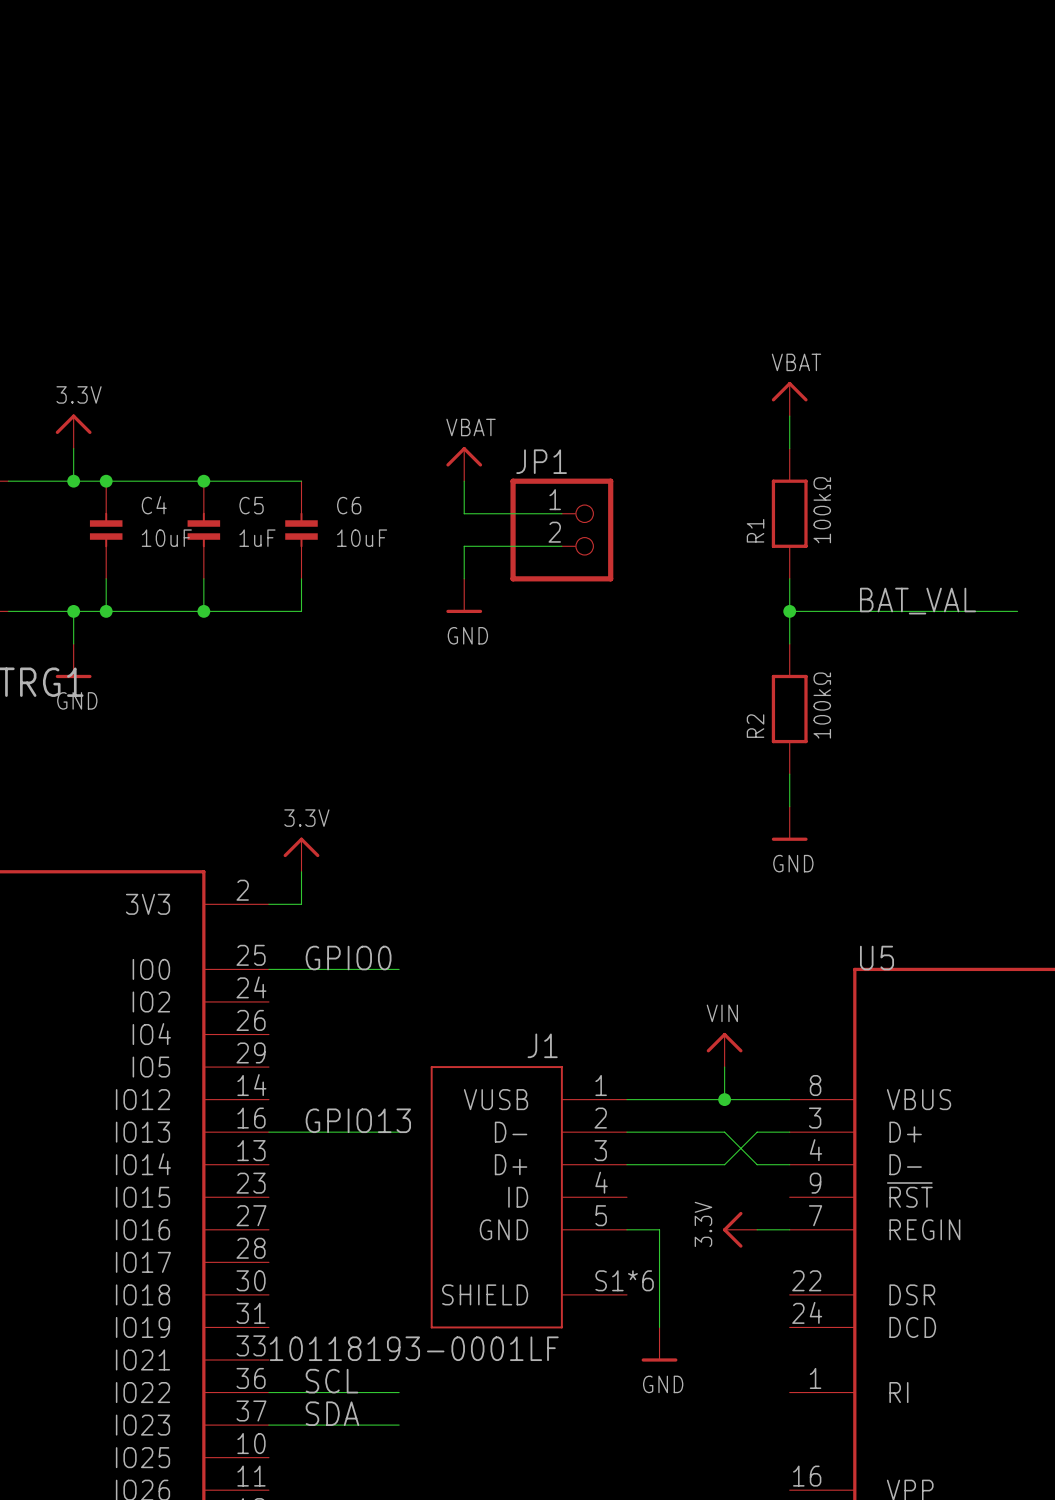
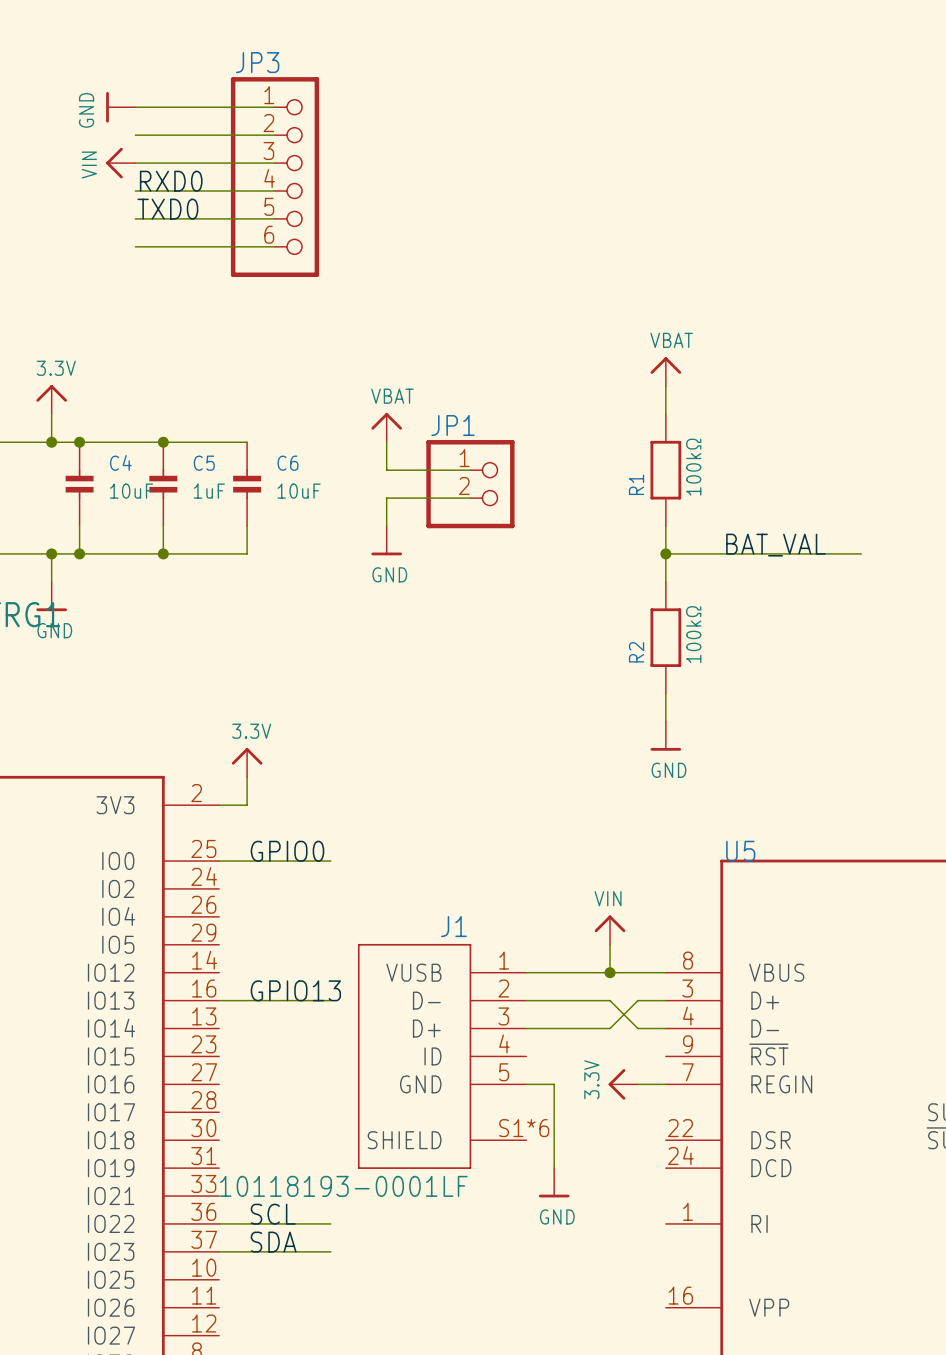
power symbol: none -> GND (120, 107)
wire: none -> (135, 107) (275, 107)
wire: none -> (135, 135) (275, 135)
power symbol: none -> VIN (120, 163)
wire: none -> (135, 163) (275, 163)
JP3: none -> (275, 177)
label: none -> RXD0 (171, 181)
wire: none -> (135, 191) (275, 191)
label: none -> TXD0 (167, 209)
wire: none -> (135, 218) (275, 218)
wire: none -> (135, 246) (275, 246)

